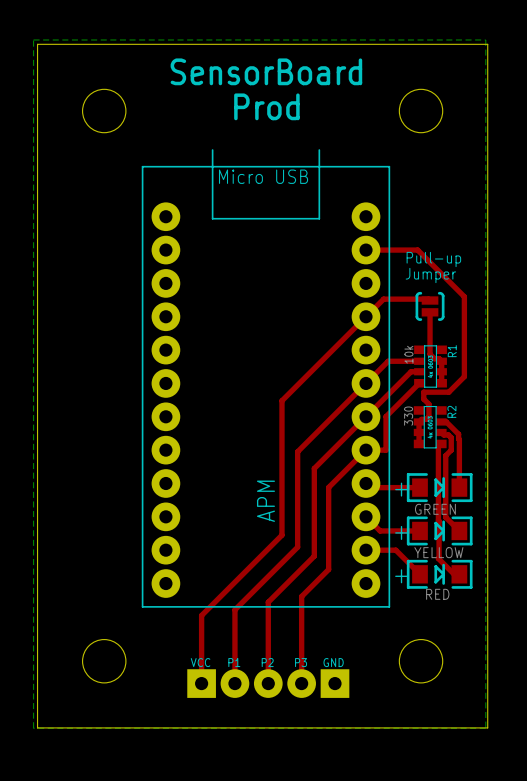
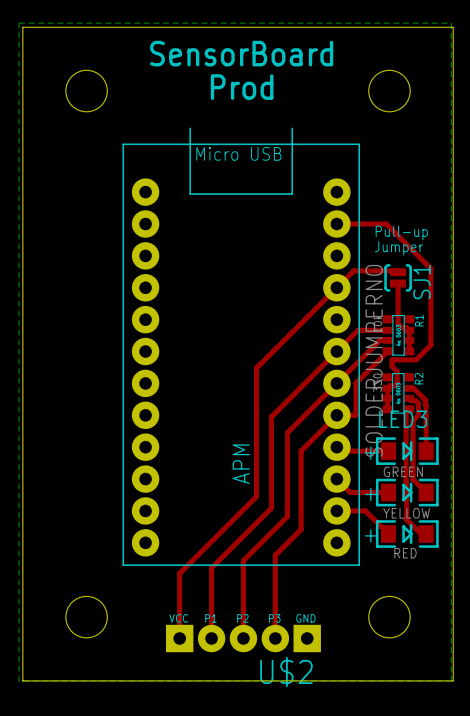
SJ1 name: none -> SJ1 (422, 282)
SJ1 value: none -> SOLDERJUMPERNO (374, 360)
LED3 name: none -> LED3 (403, 419)
U$2 name: none -> U$2 (286, 671)

